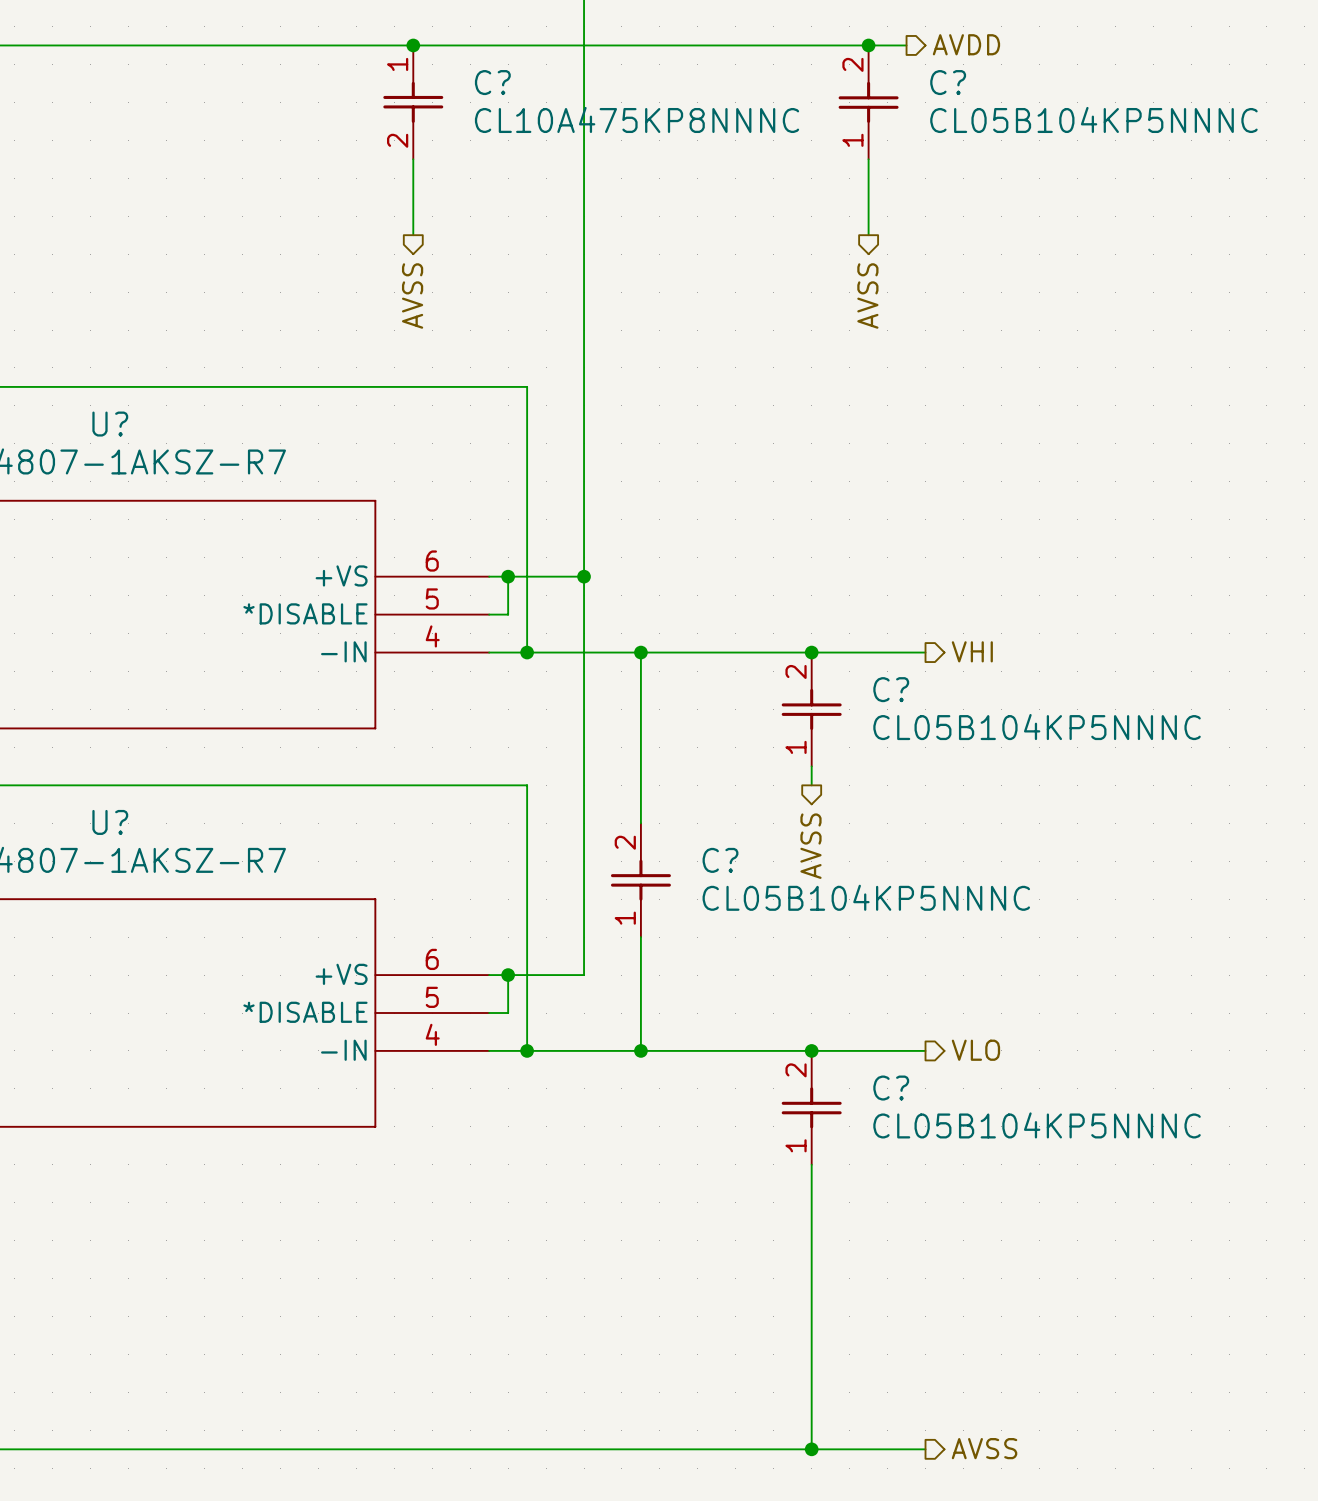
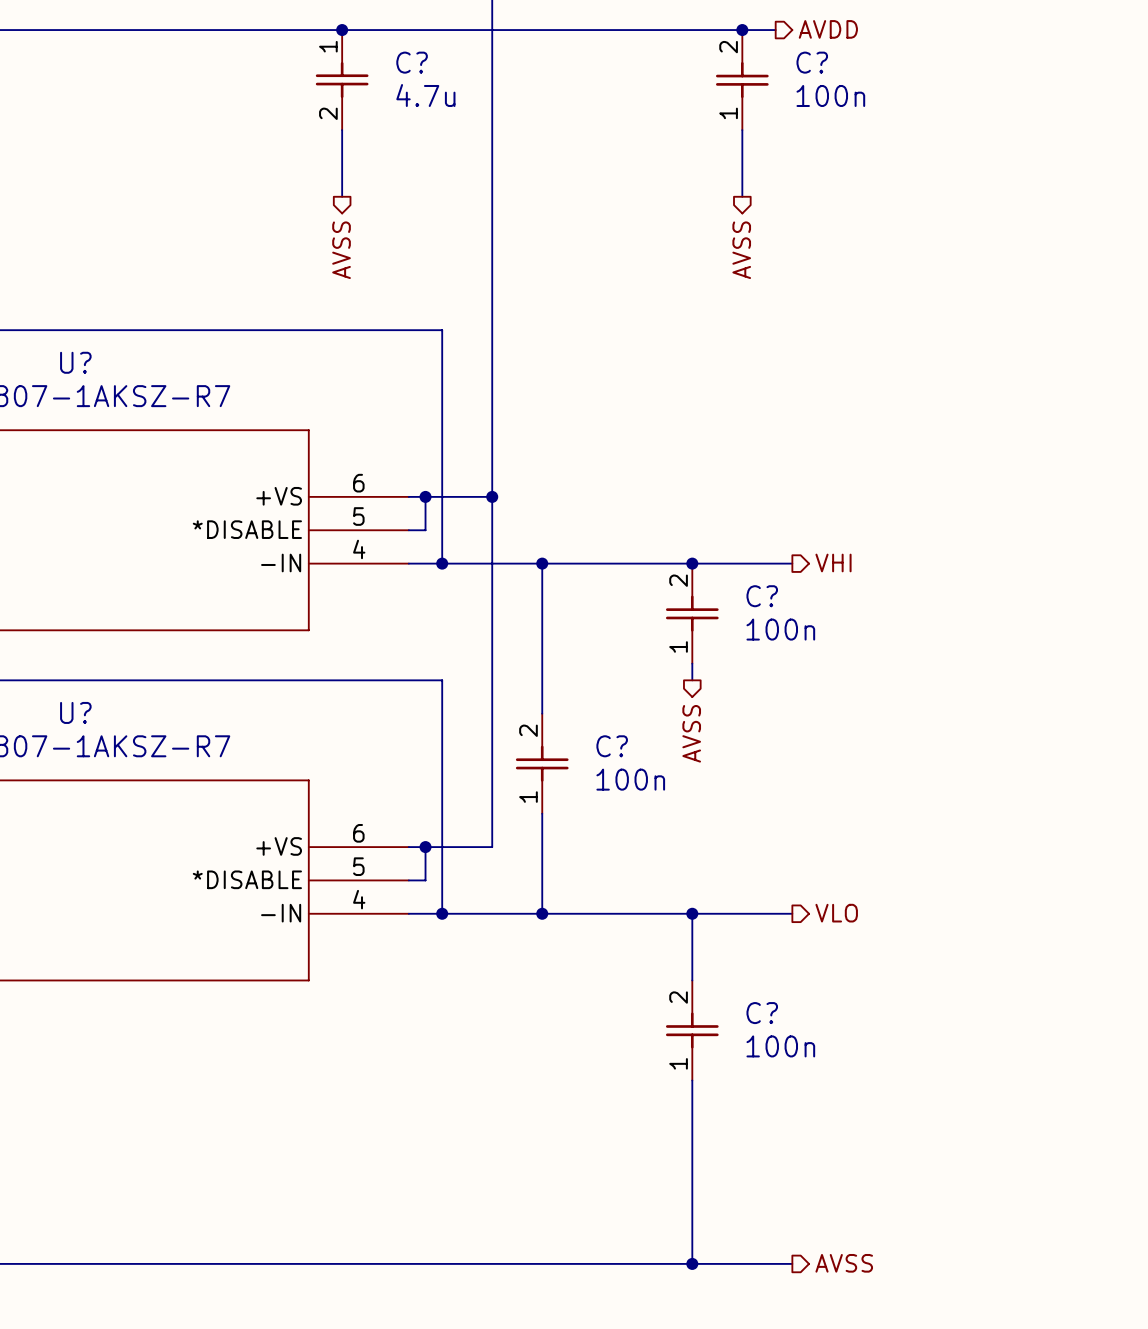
C? value: CL10A475KP8NNNC (637, 119) -> 4.7u (425, 95)
C? value: CL05B104KP5NNNC (1093, 119) -> 100n (830, 95)
C? value: CL05B104KP5NNNC (1037, 727) -> 100n (780, 629)
C? value: CL05B104KP5NNNC (866, 897) -> 100n (630, 779)
C?: CL05B104KP5NNNC (811, 1107) -> none
C?: none -> 100n (692, 1030)

